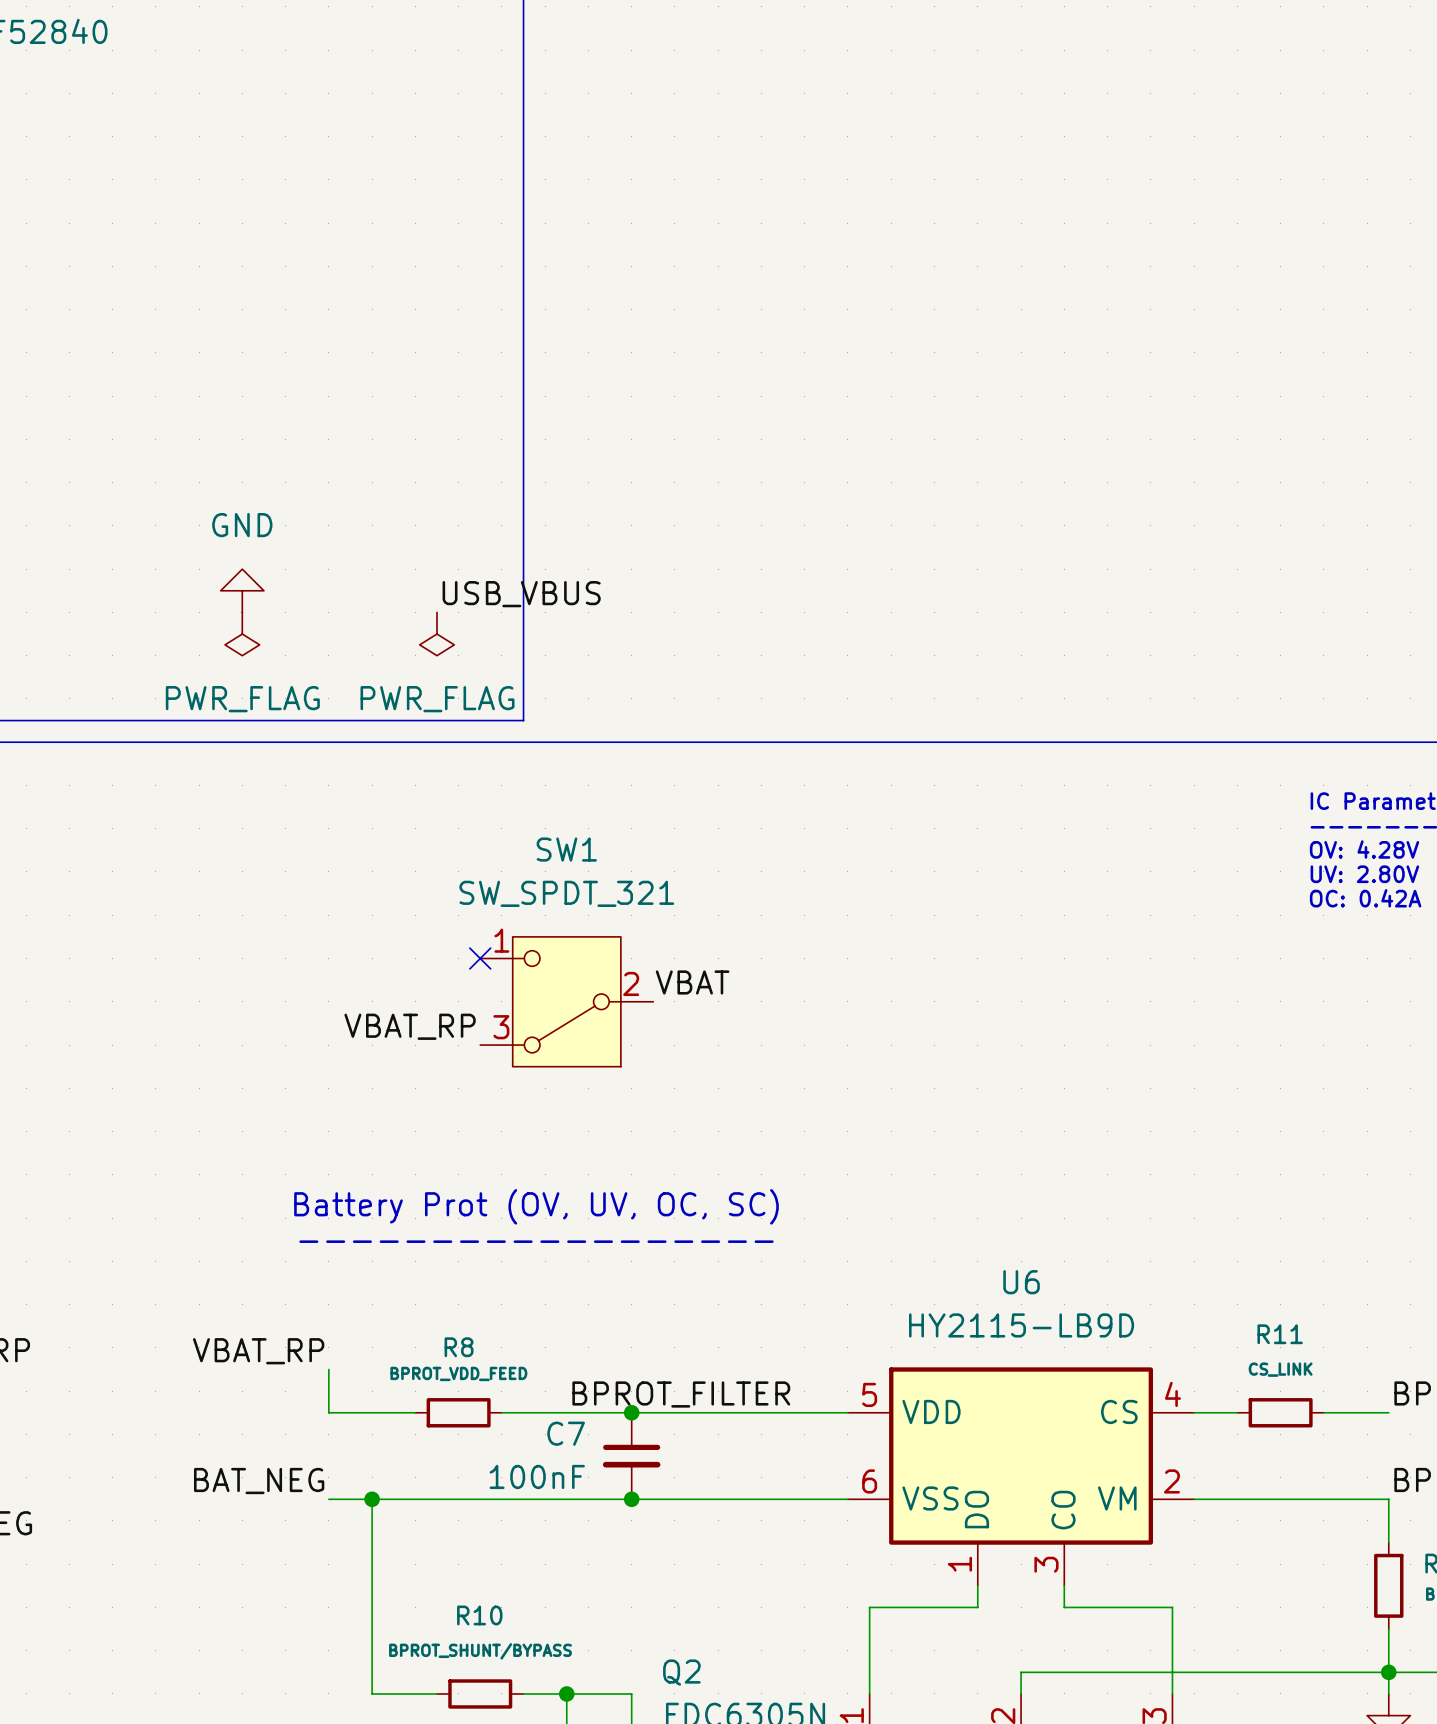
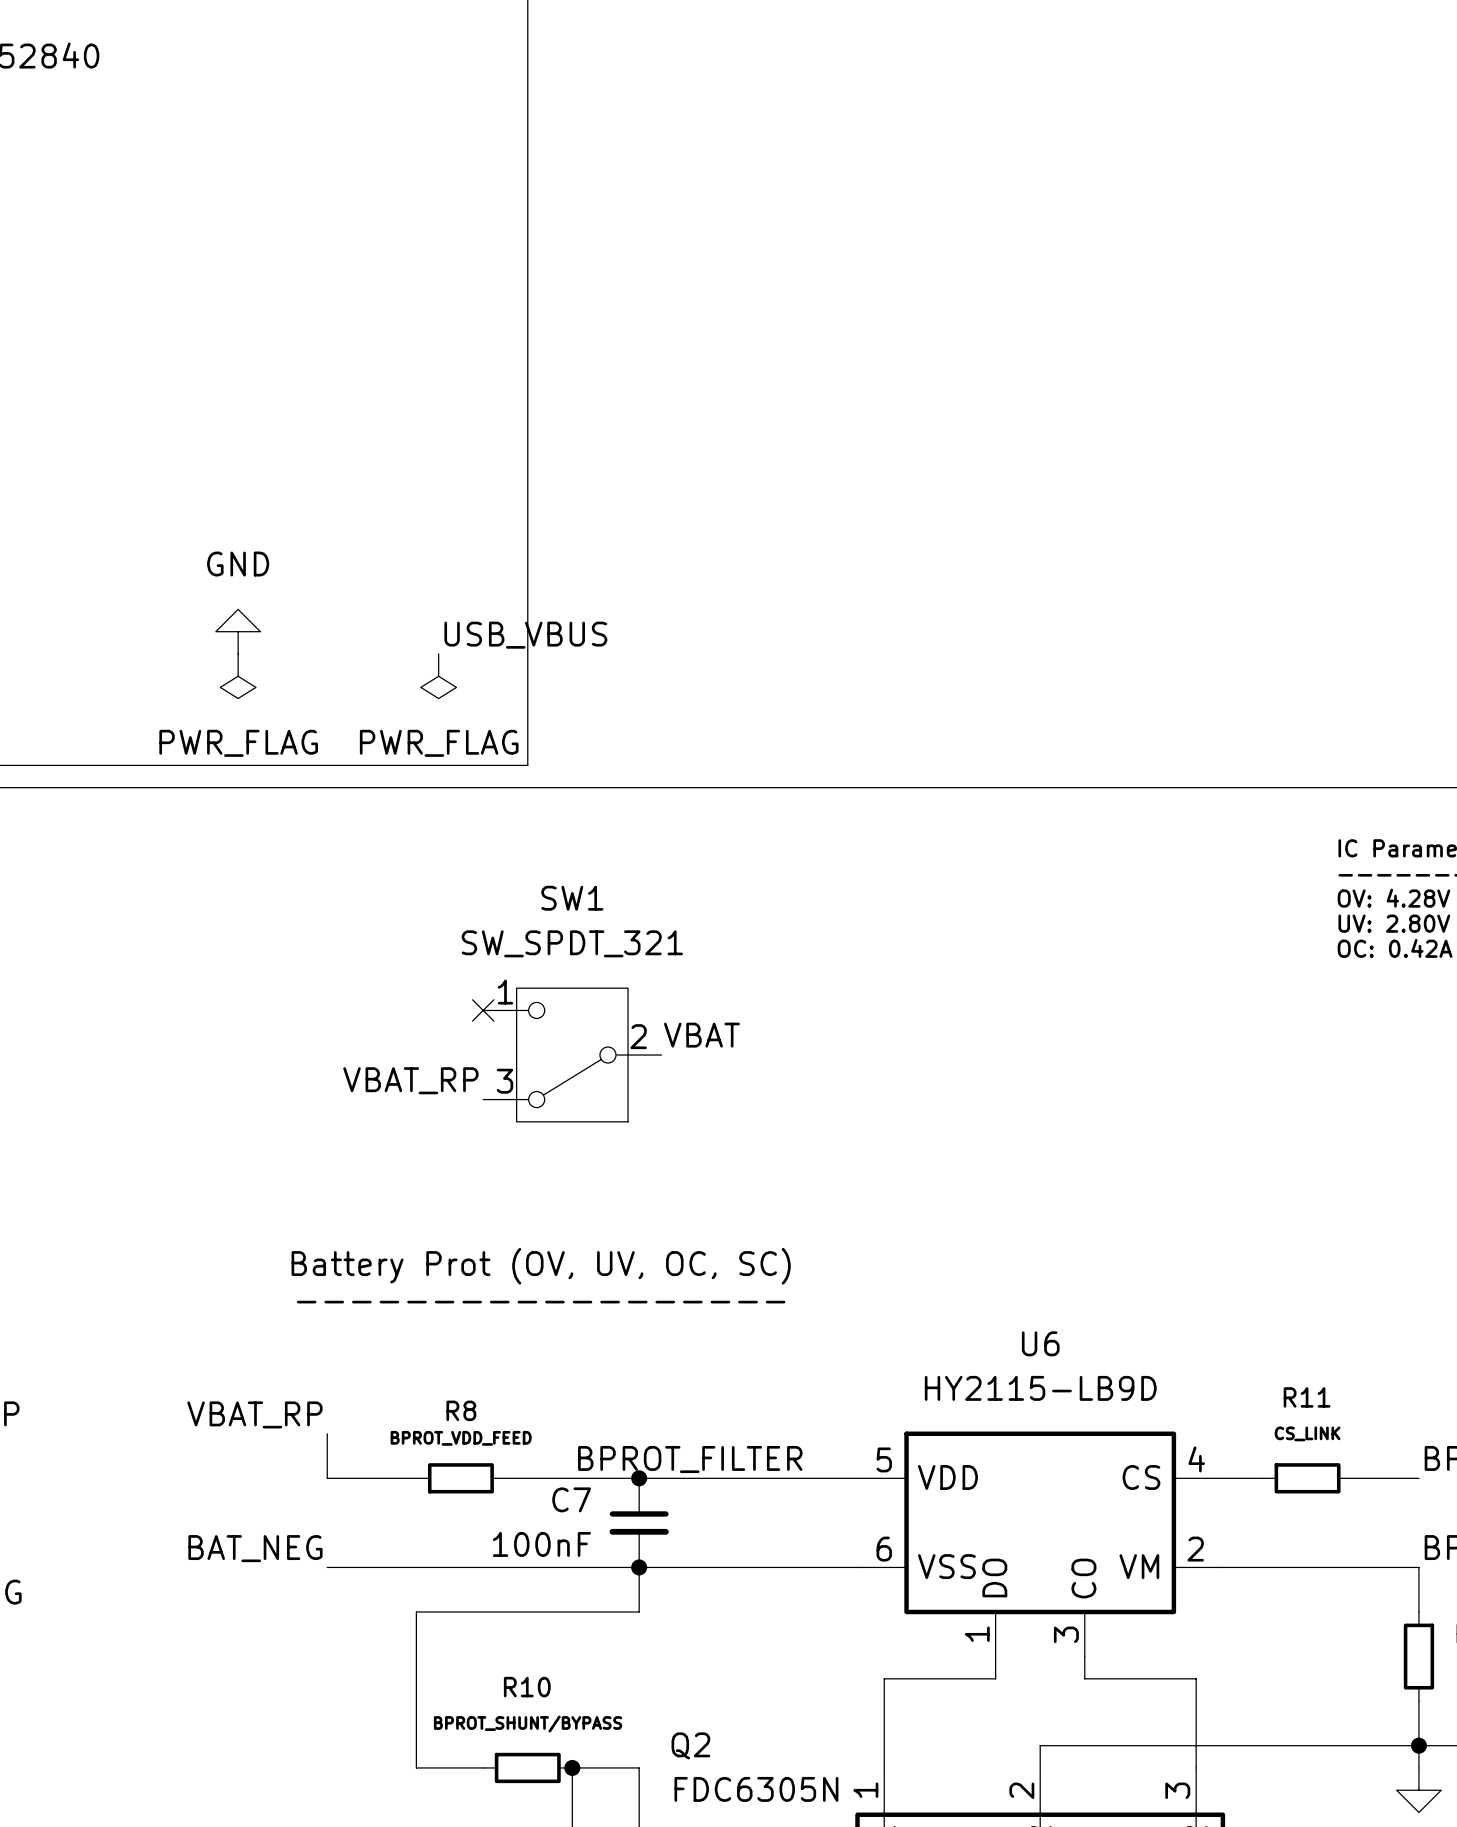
wire: (372, 1499) (372, 1693) (415, 1693) -> (639, 1567) (639, 1612) (416, 1612) (416, 1767)
junction: (372, 1499) -> none
R10 position: (480, 1693) -> (527, 1767)
wire: (523, 1693) (566, 1693) -> (438, 1767) (483, 1767)

